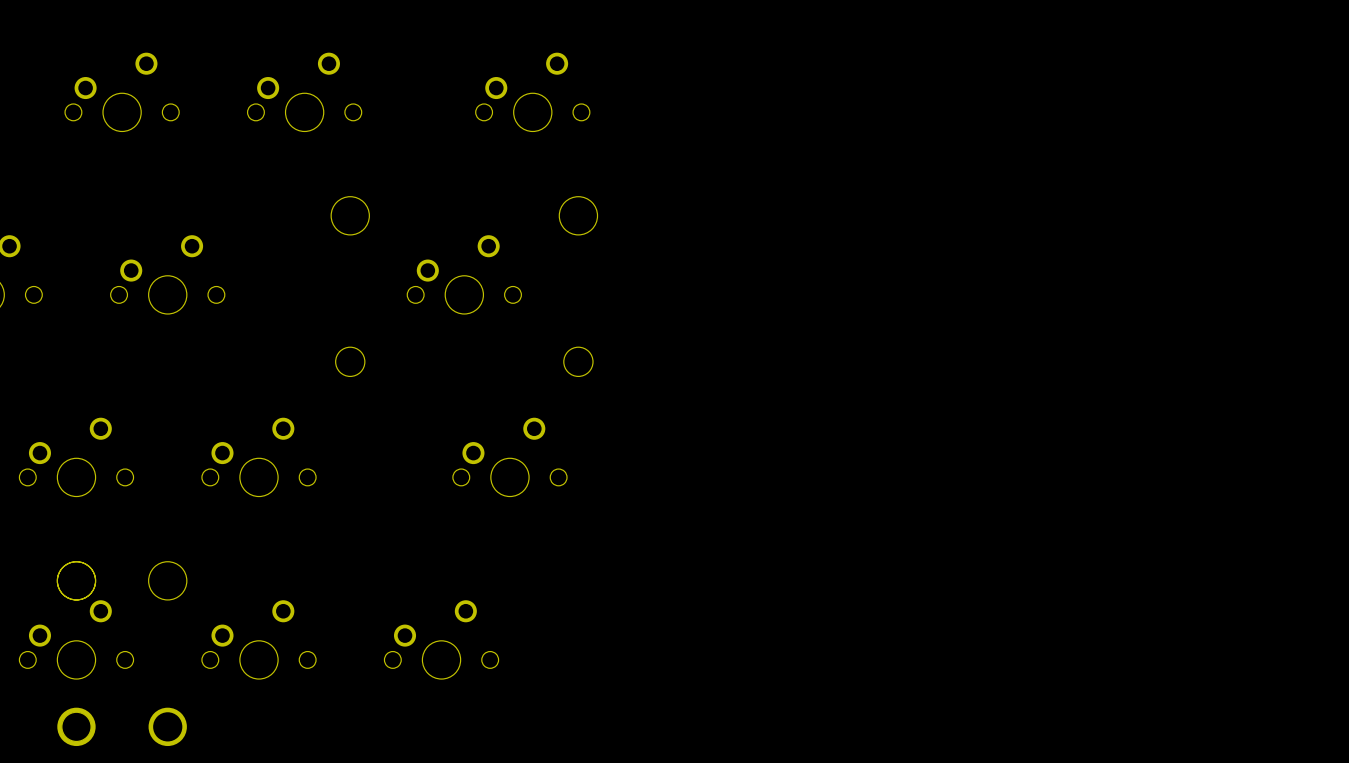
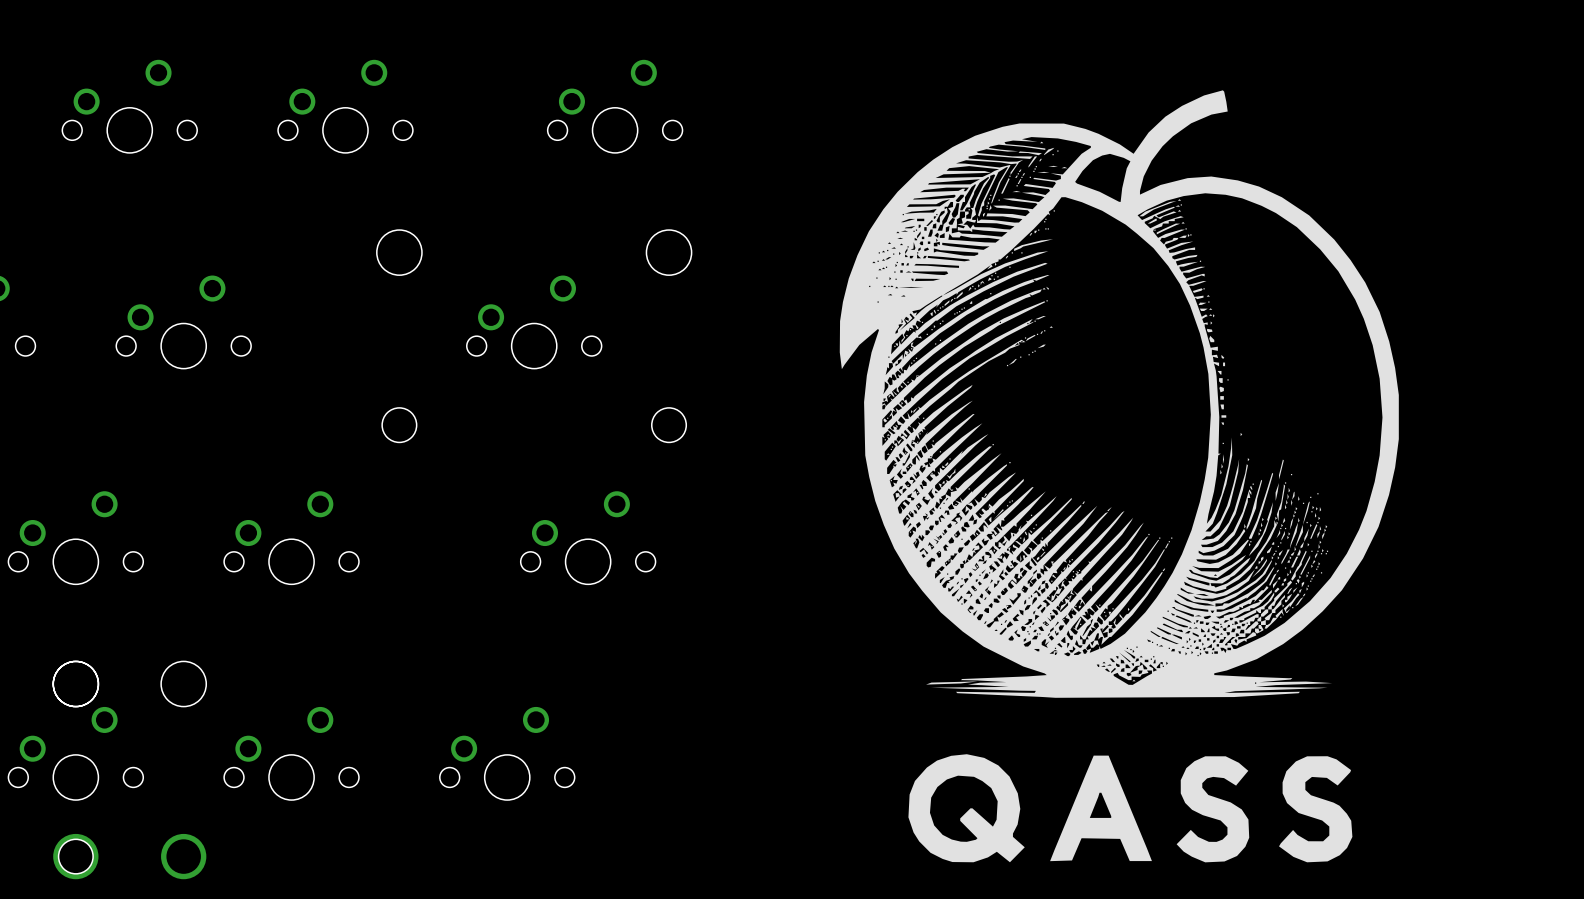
drawing: none -> [839, 90, 1399, 698]
drawing: none -> [908, 754, 1025, 863]
drawing: none -> [1050, 755, 1152, 862]
drawing: none -> [1279, 756, 1353, 863]
drawing: none -> [1176, 756, 1250, 863]

